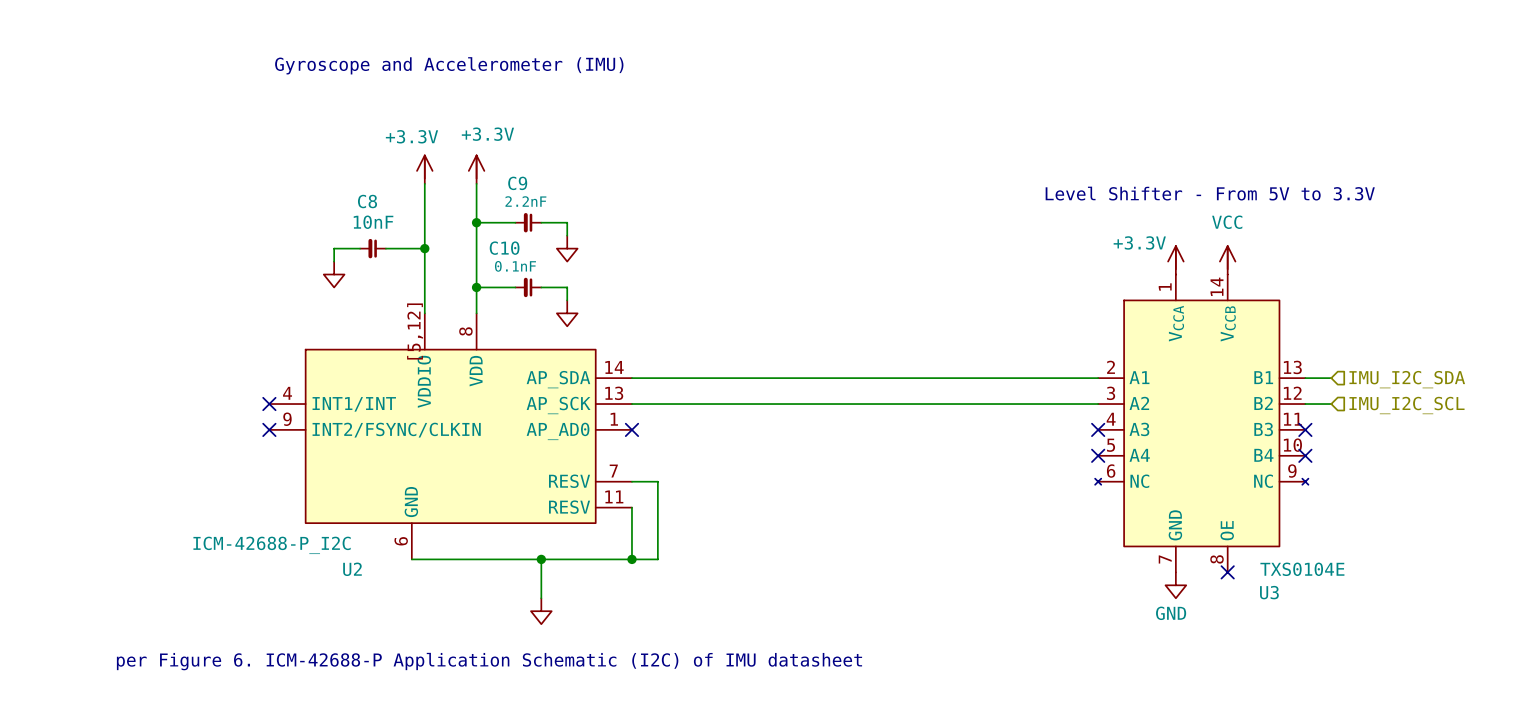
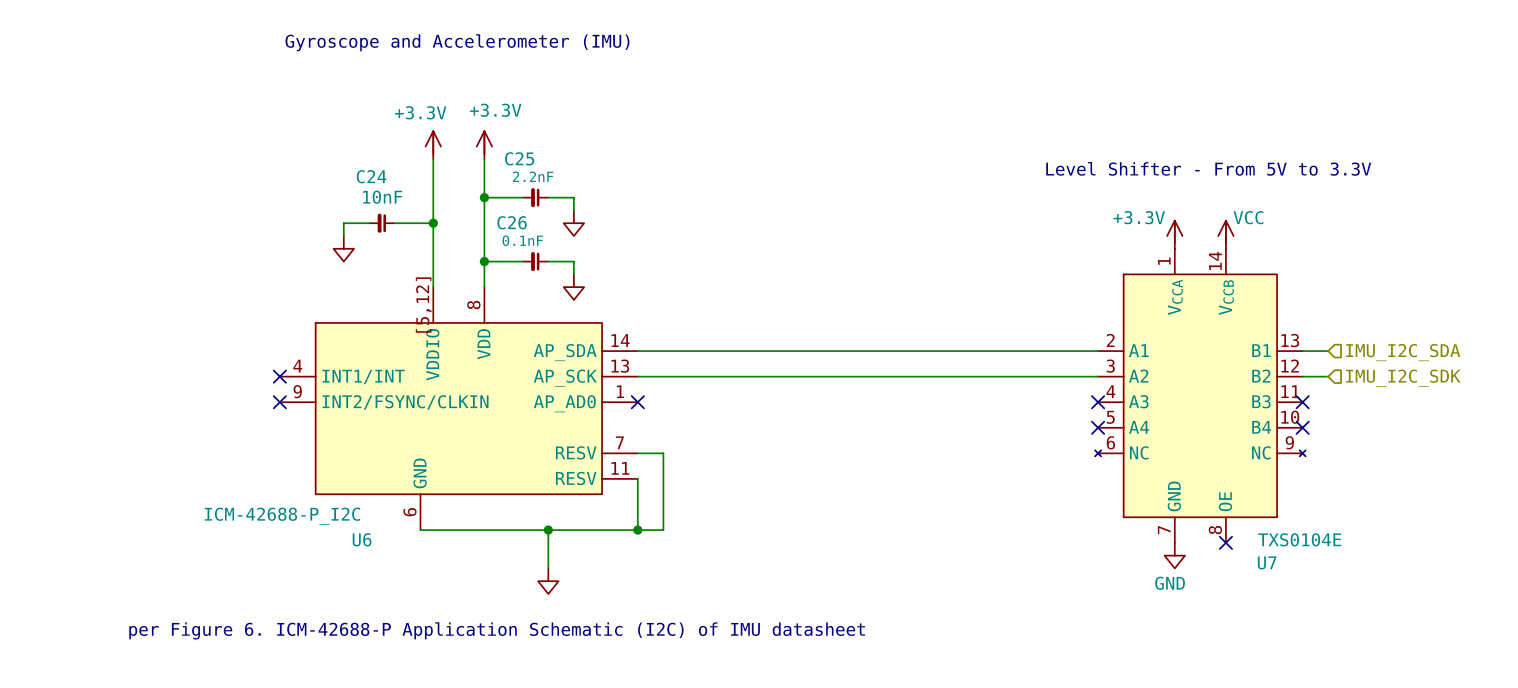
C9 name: C9 (517, 183) -> C25 (519, 158)
C8 name: C8 (367, 201) -> C24 (371, 176)
power symbol text position: VCC (1227, 222) -> VCC (1248, 217)
C10 name: C10 (504, 248) -> C26 (512, 222)
hierarchical label: IMU_I2C_SCL (1407, 405) -> IMU_I2C_SDK (1403, 378)
U2 name: U2 (352, 569) -> U6 (362, 539)
U3 name: U3 (1269, 592) -> U7 (1267, 562)

